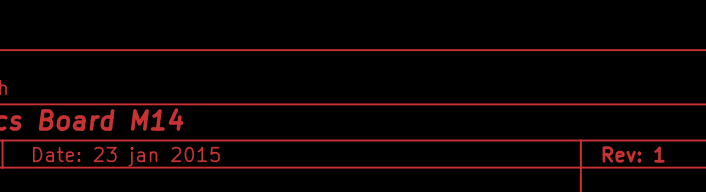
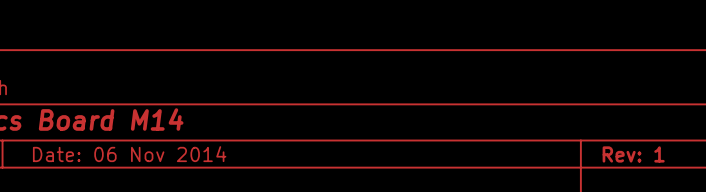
title block: Date: 23 jan 2015 (126, 156) -> Date: 06 Nov 2014 (129, 154)

